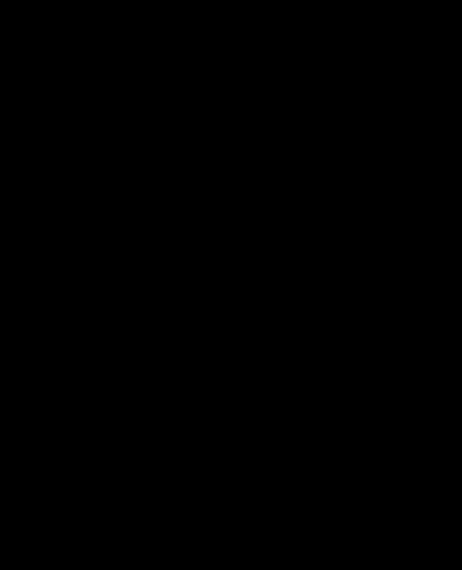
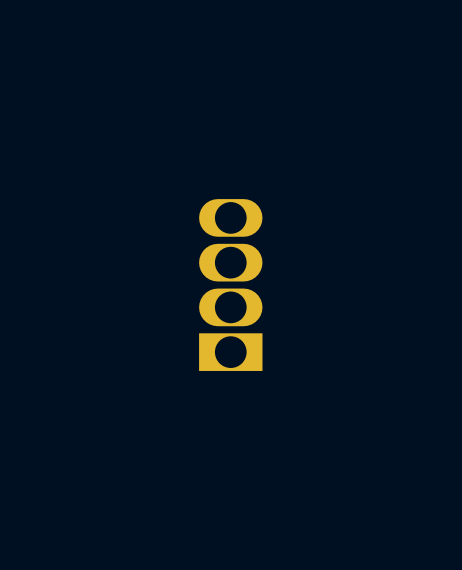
part: none -> (230, 285)

